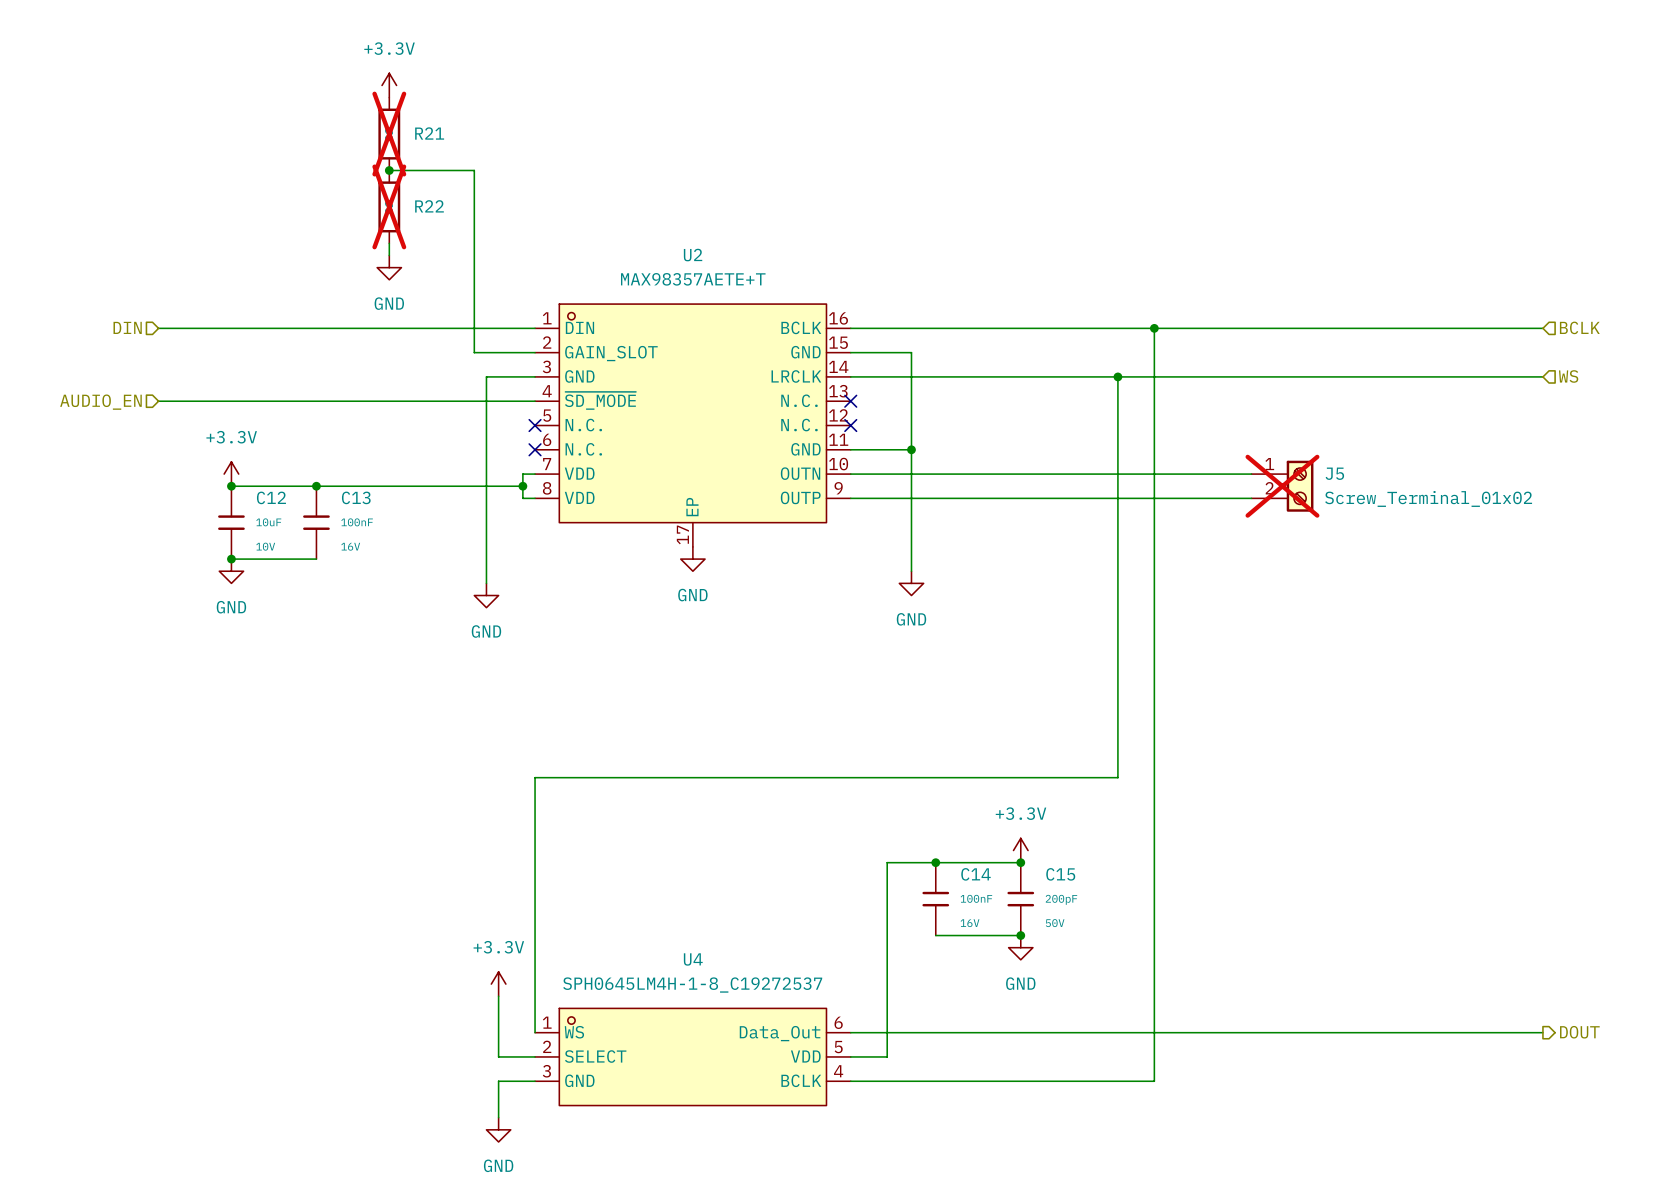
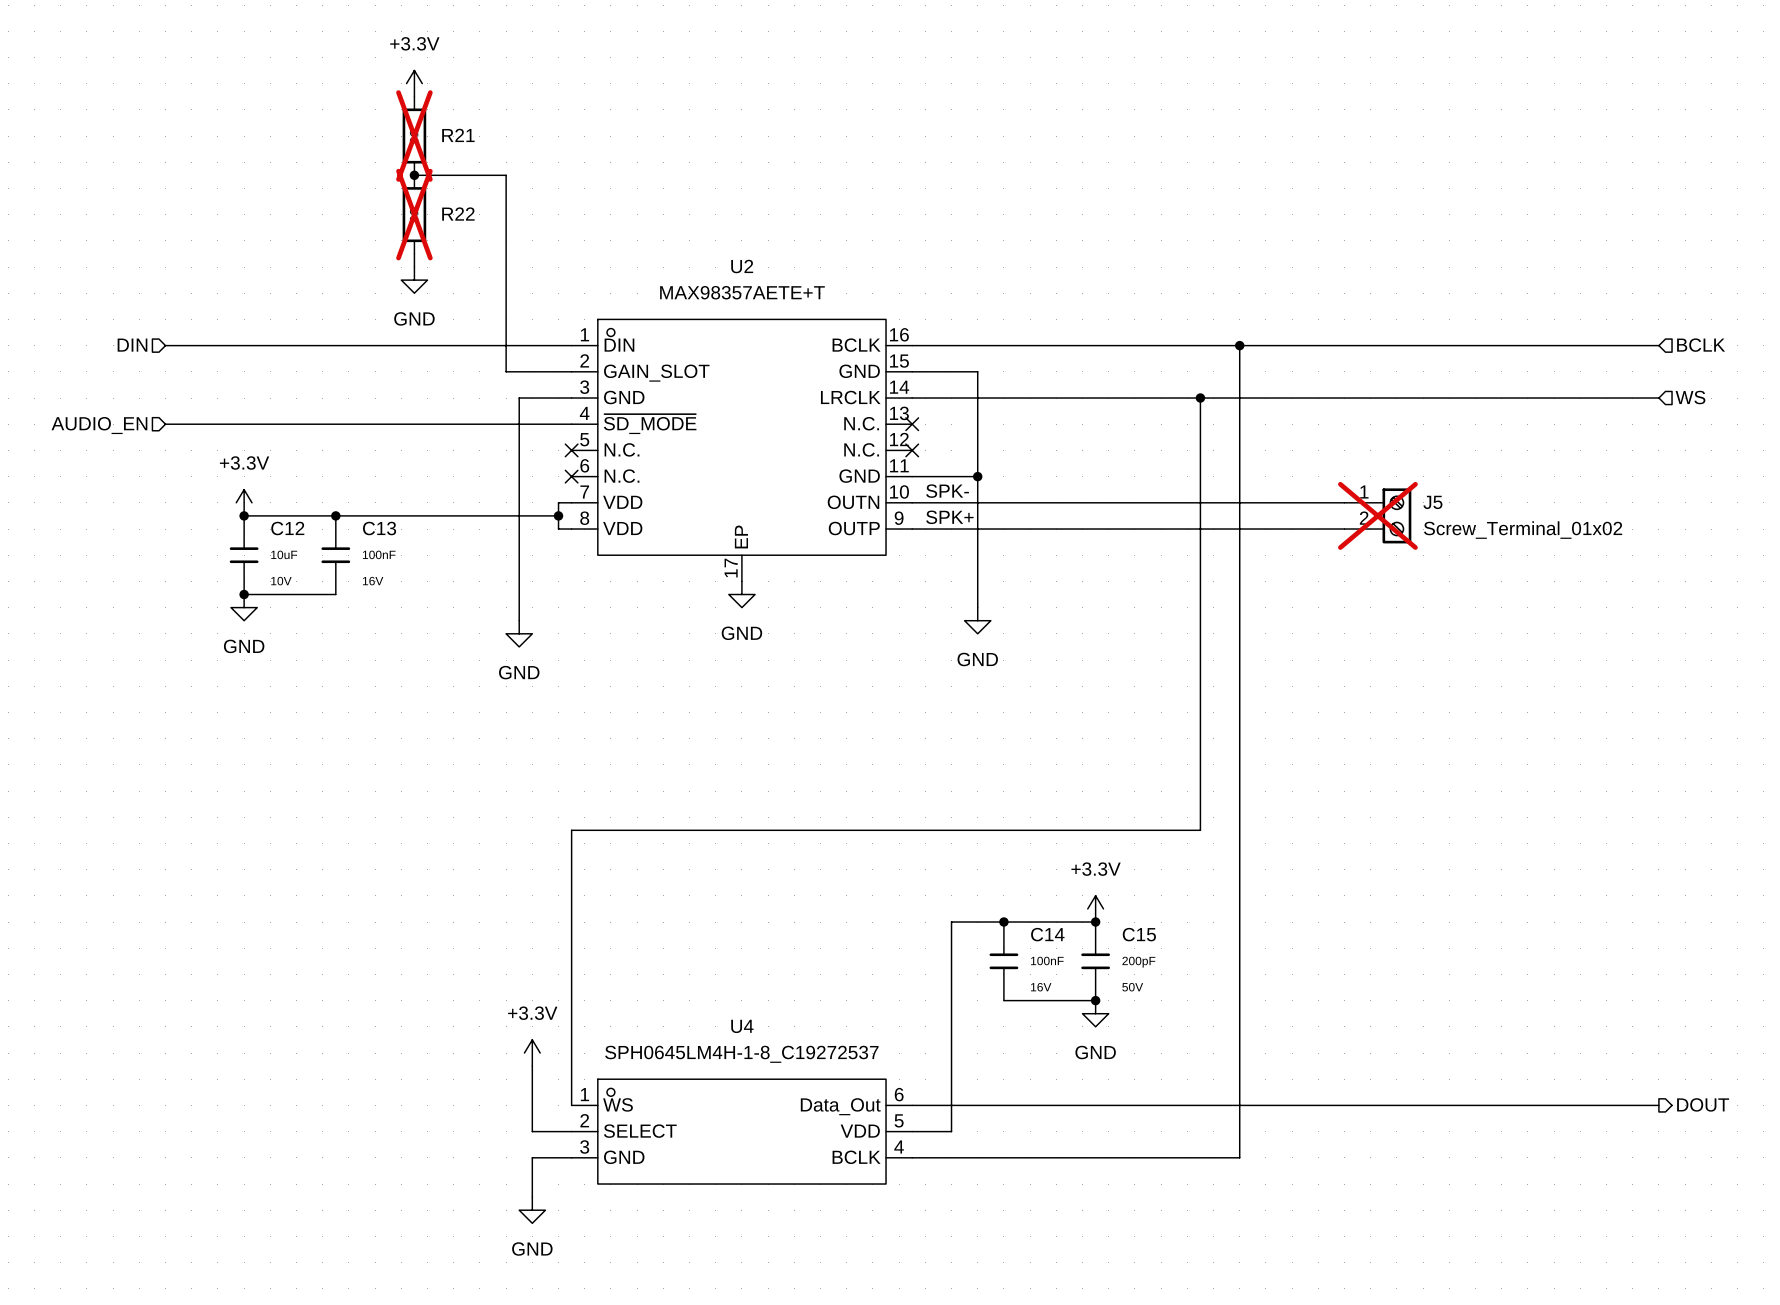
label: none -> SPK- (947, 491)
label: none -> SPK+ (949, 517)

